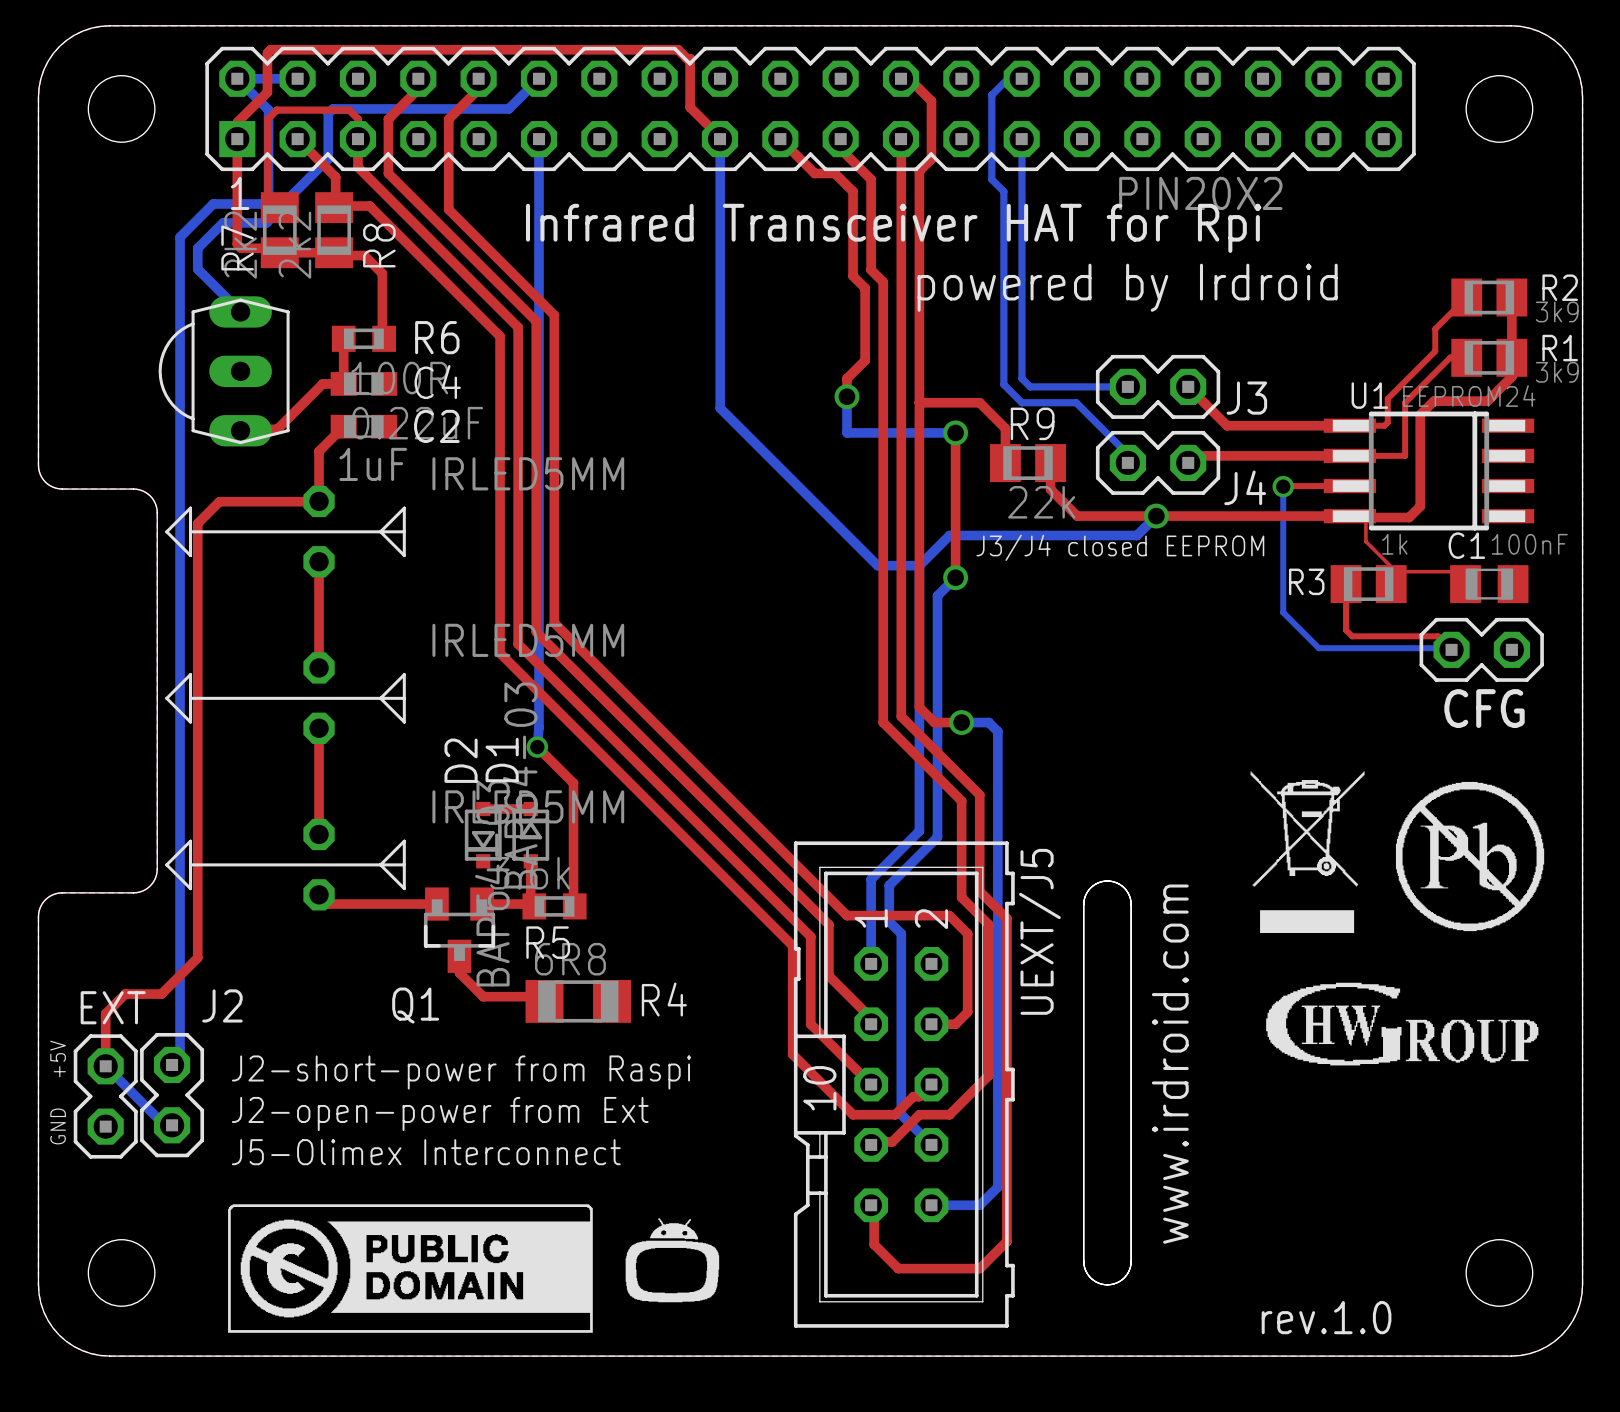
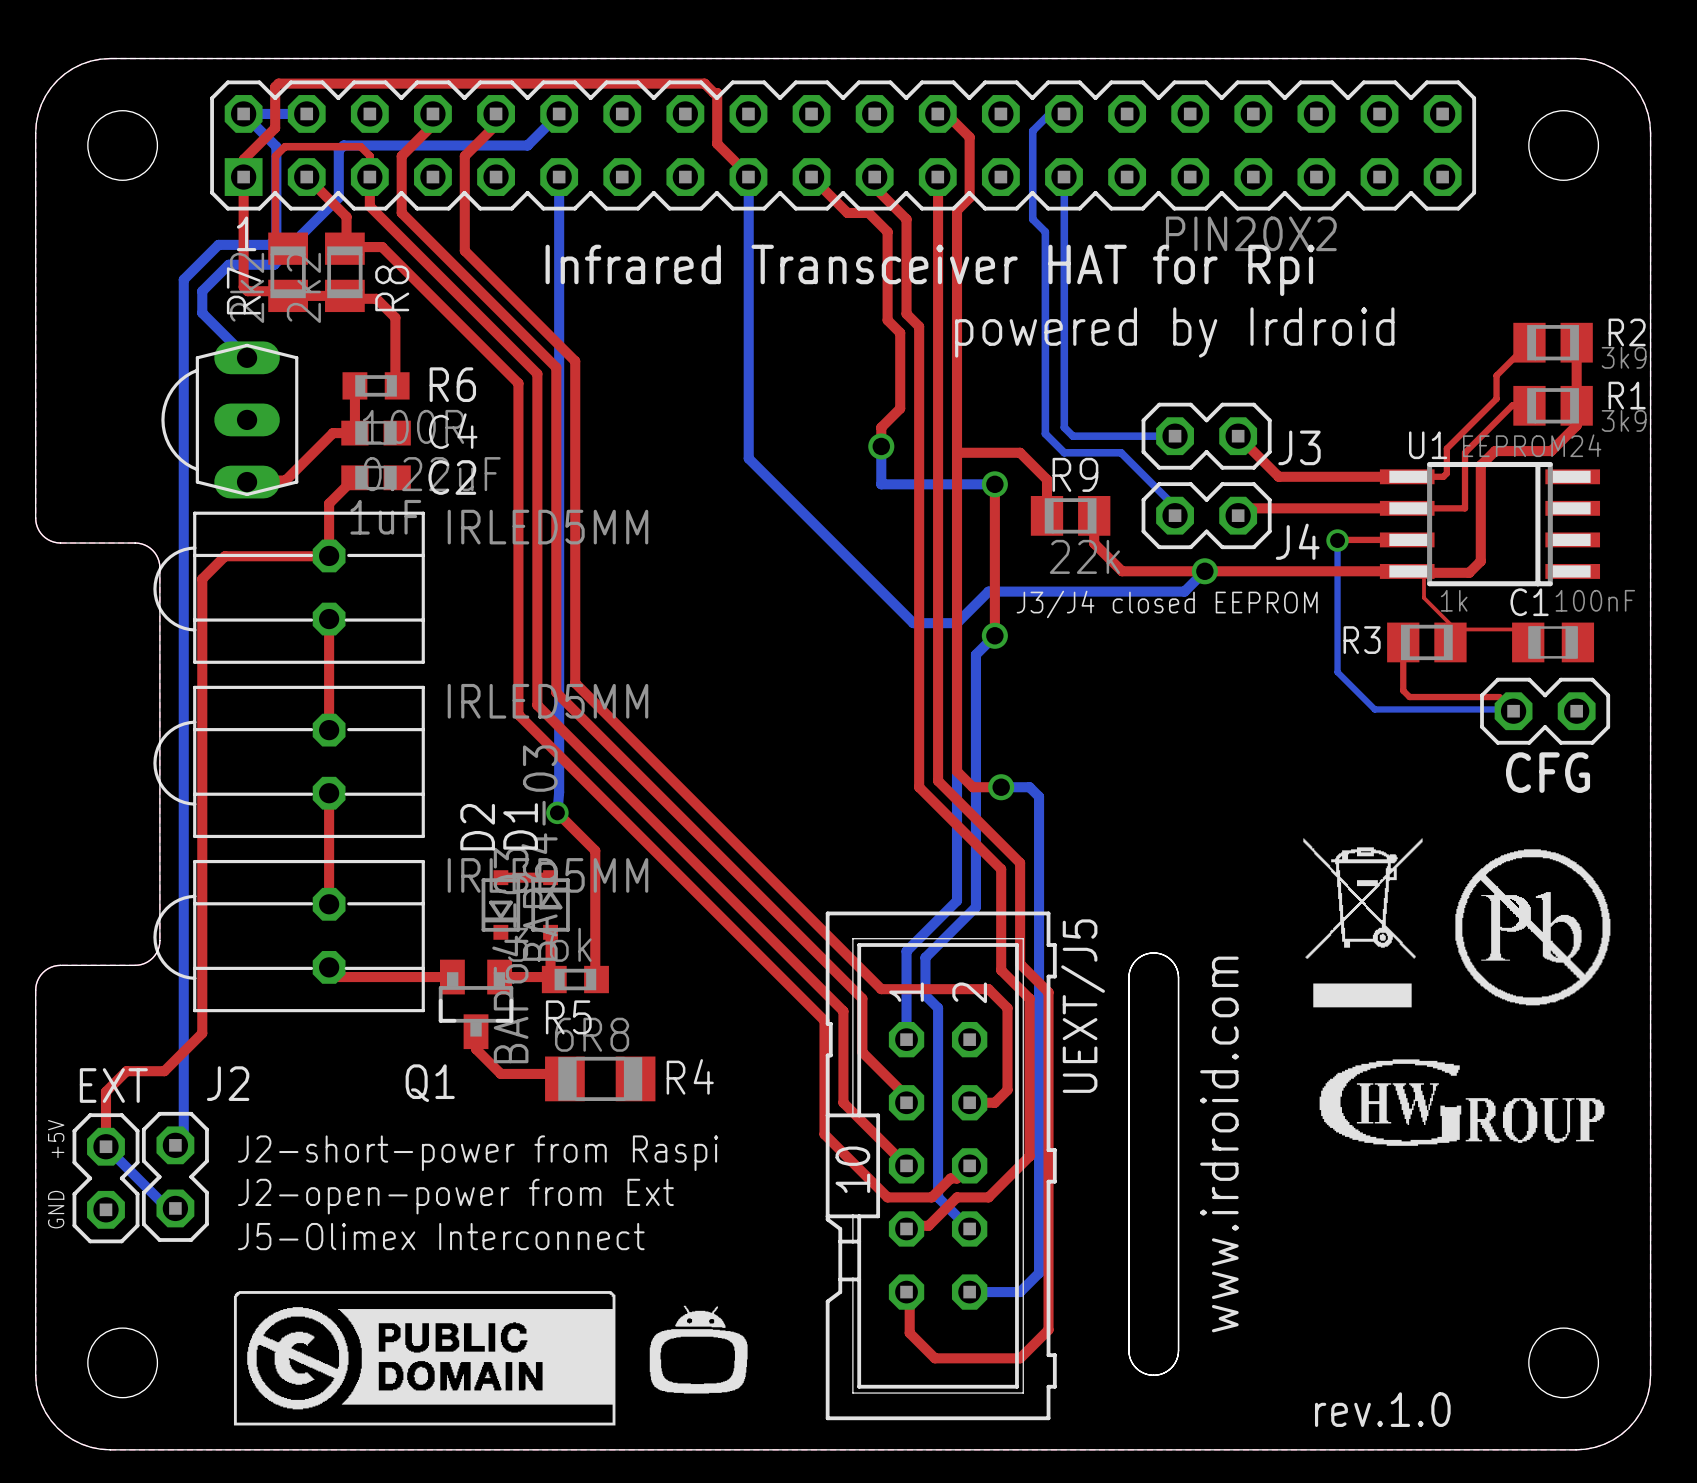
part footprint: [165, 485, 406, 578] -> [153, 511, 425, 664]
part footprint: [165, 652, 406, 744] -> [153, 685, 425, 839]
part footprint: [165, 818, 406, 911] -> [153, 859, 425, 1013]

